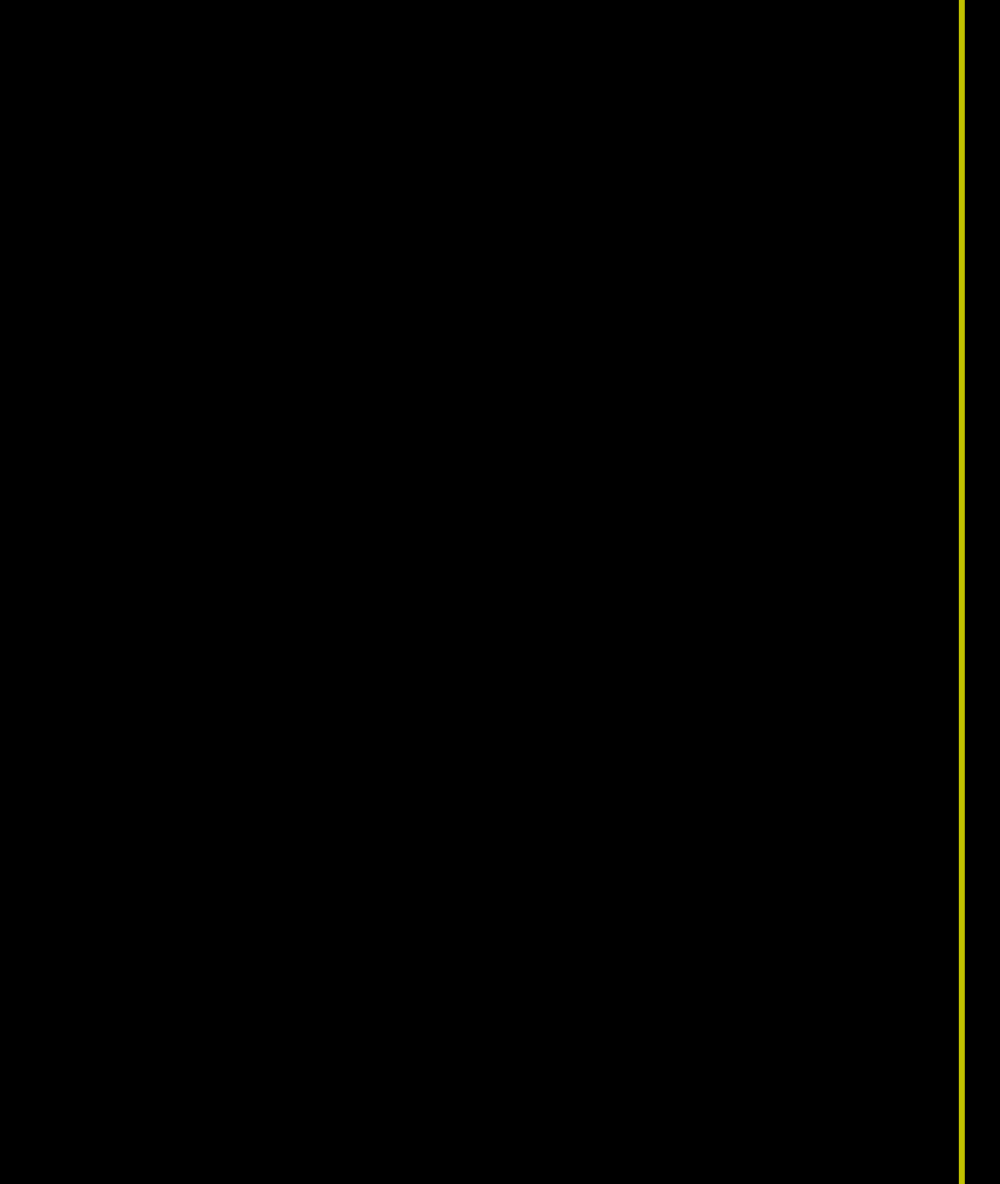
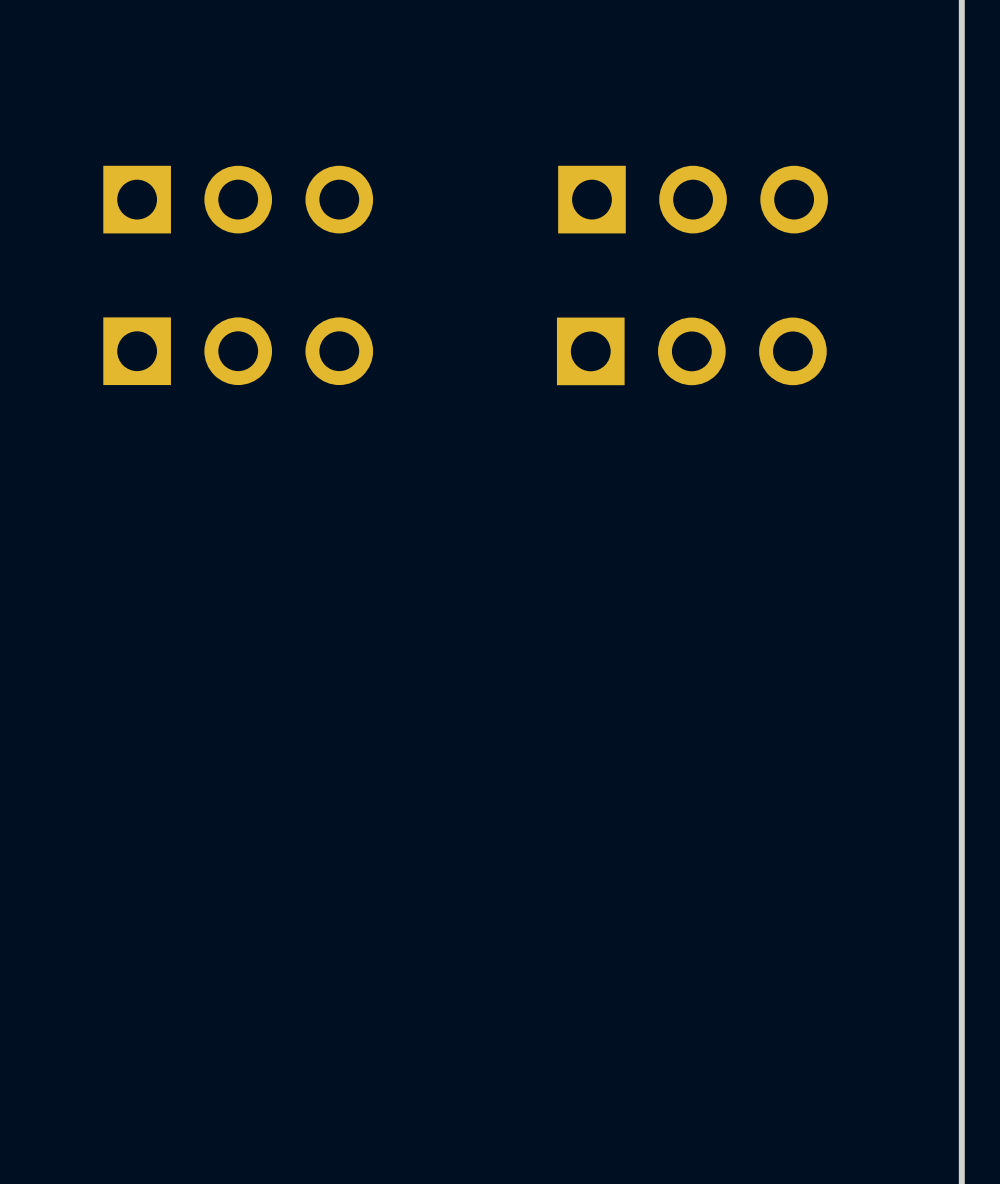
part: none -> (238, 199)
part: none -> (693, 199)
part: none -> (238, 351)
part: none -> (691, 351)

